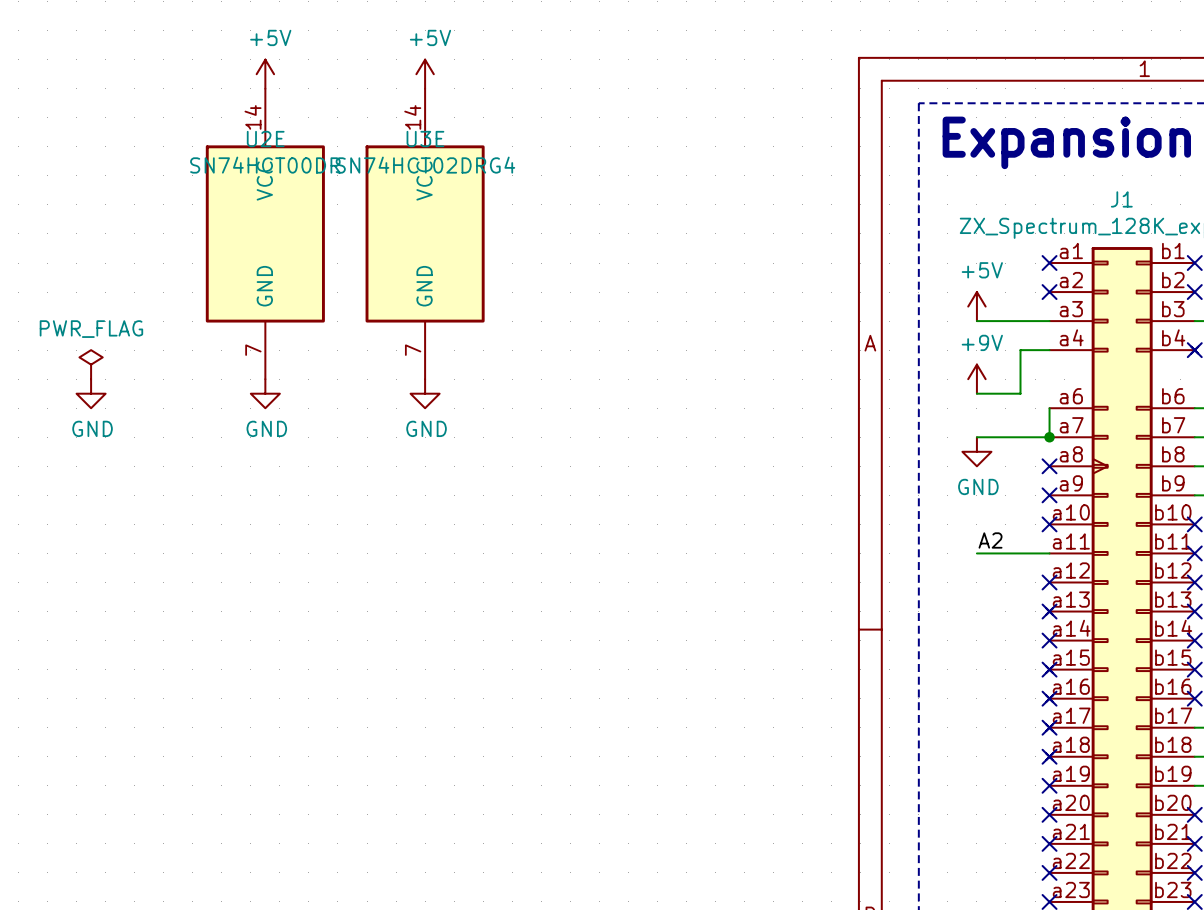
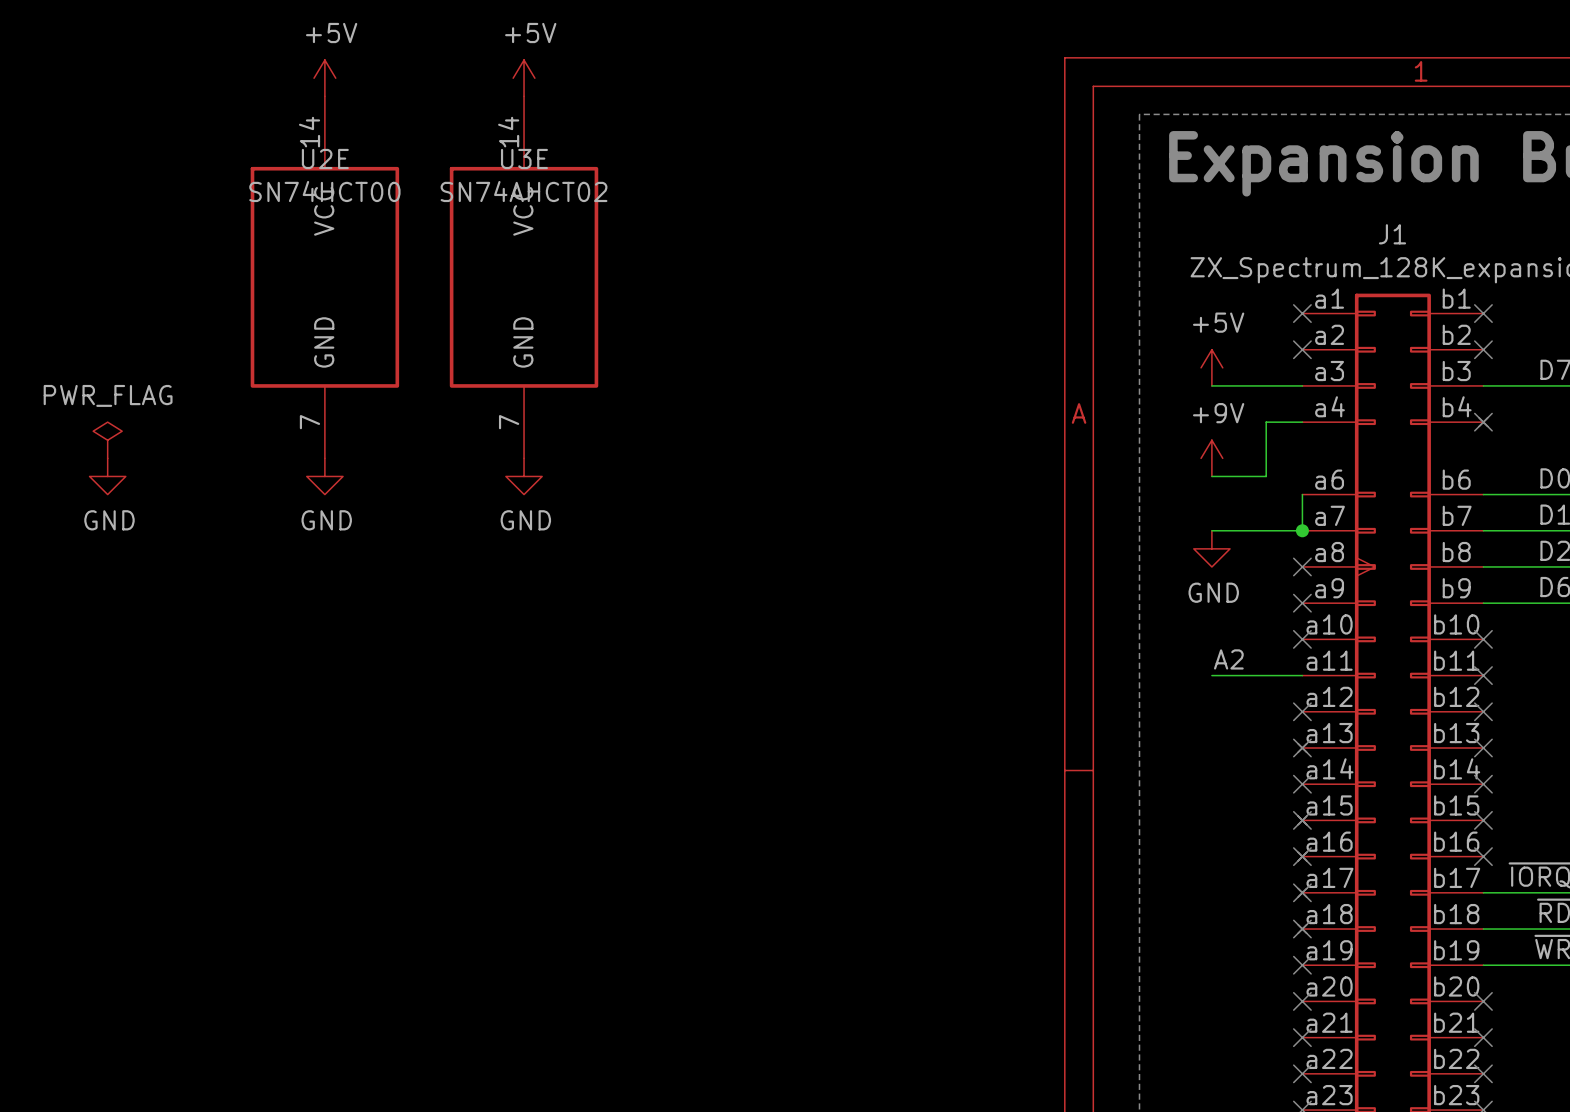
U2E value: SN74HCT00DR (265, 165) -> SN74HCT00 (324, 191)
U3E value: SN74HCT02DRG4 (425, 165) -> SN74AHCT02 (524, 191)

